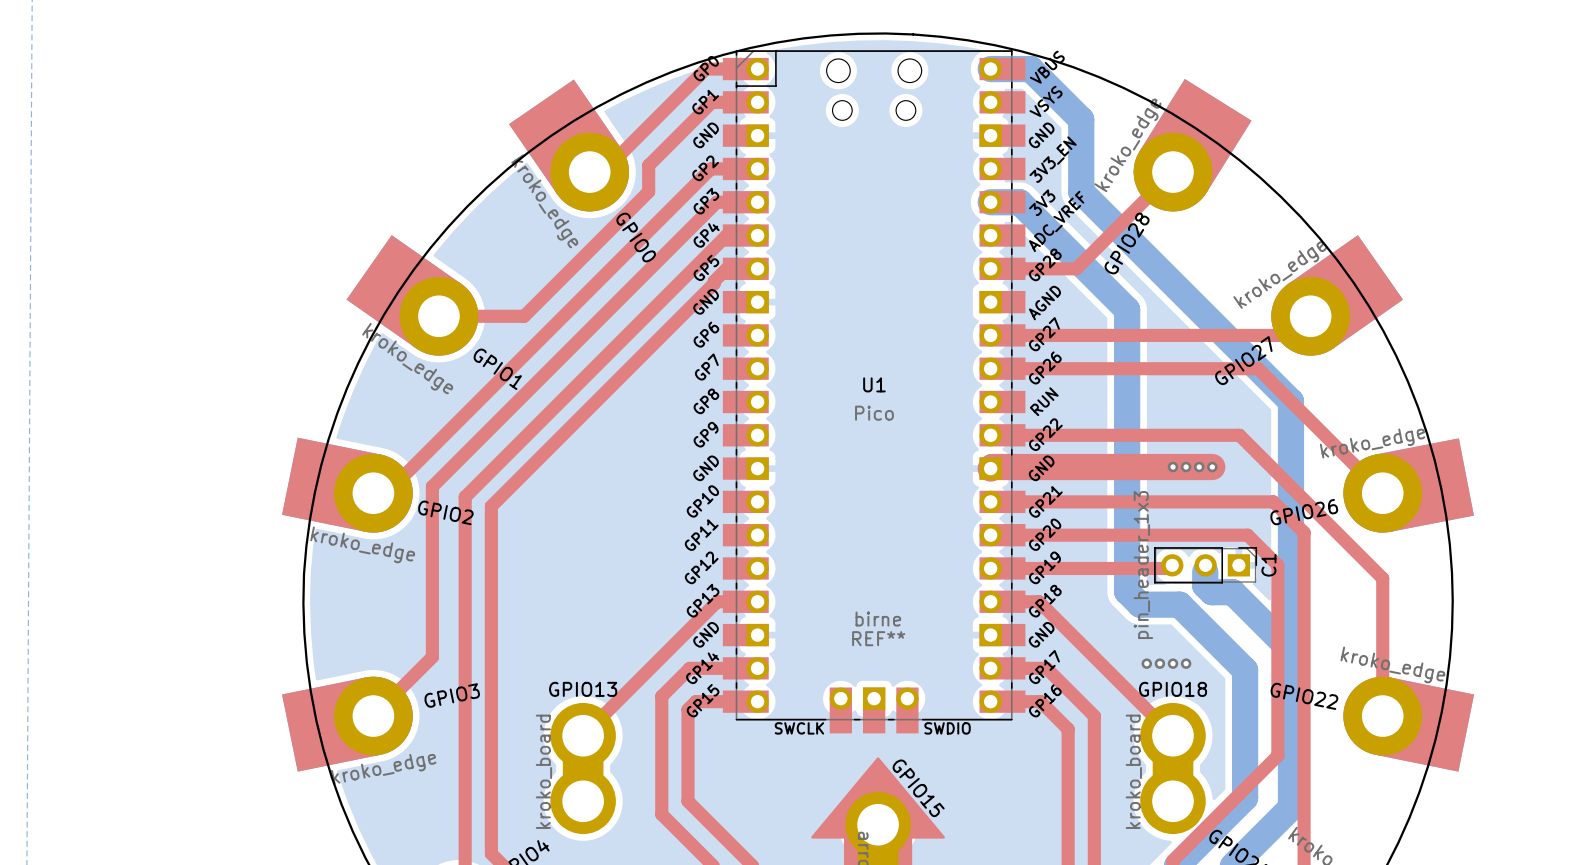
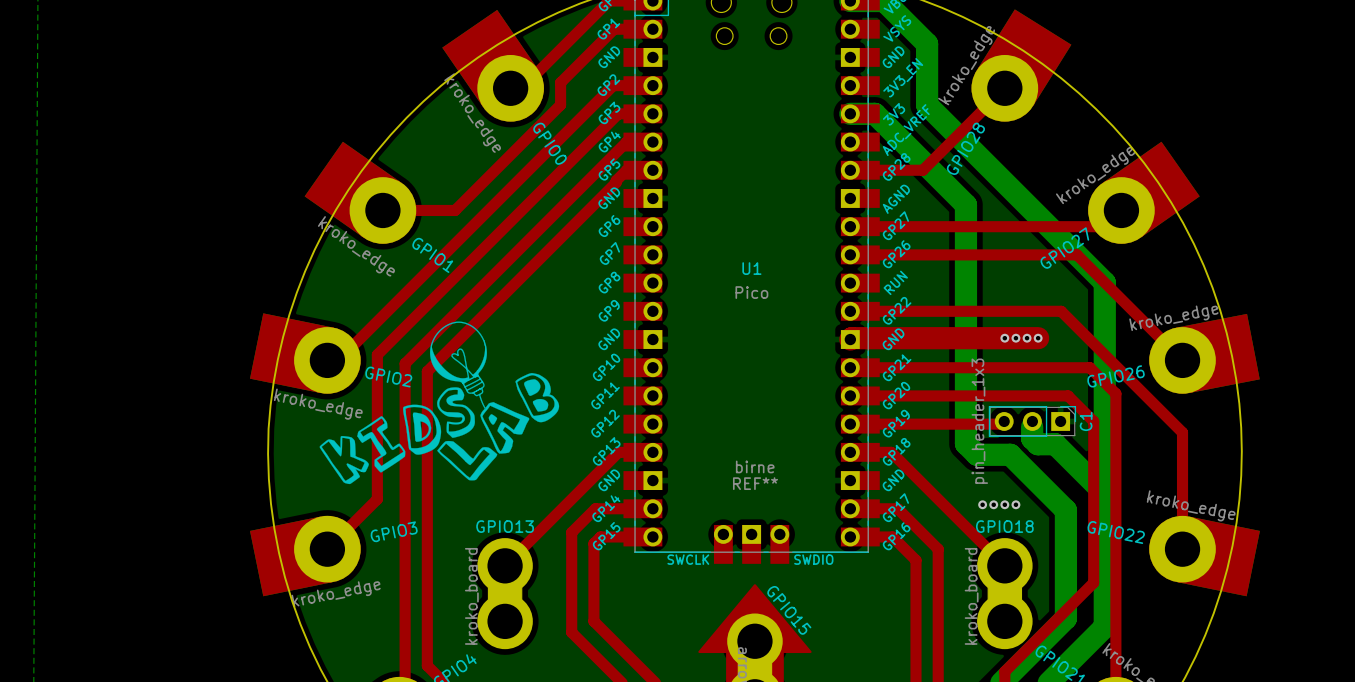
drawing: none -> [319, 321, 560, 485]

